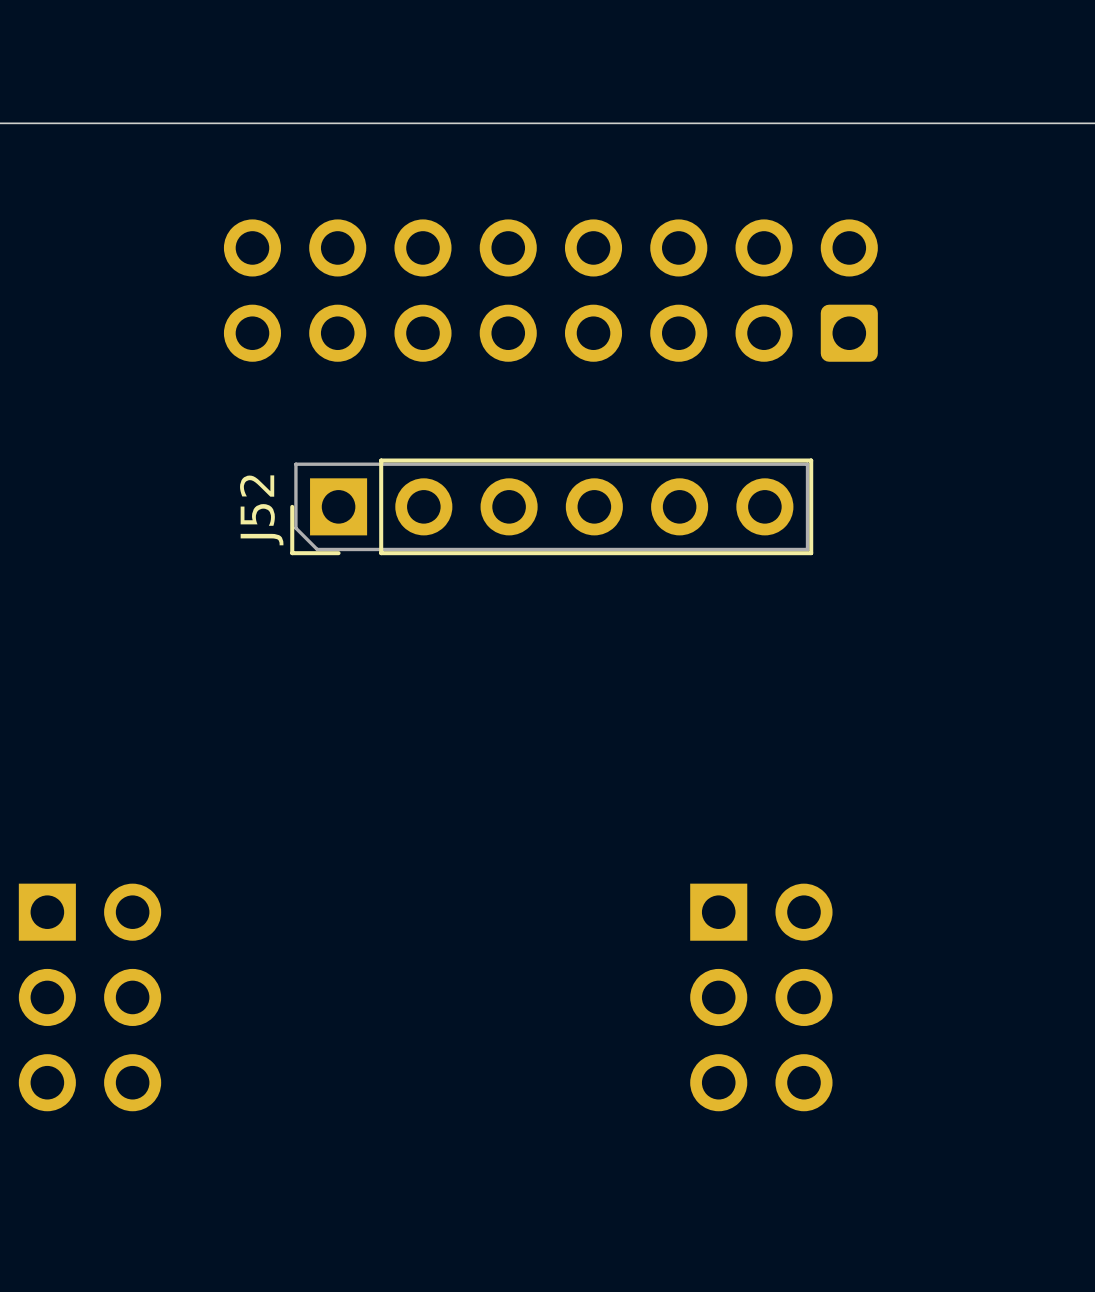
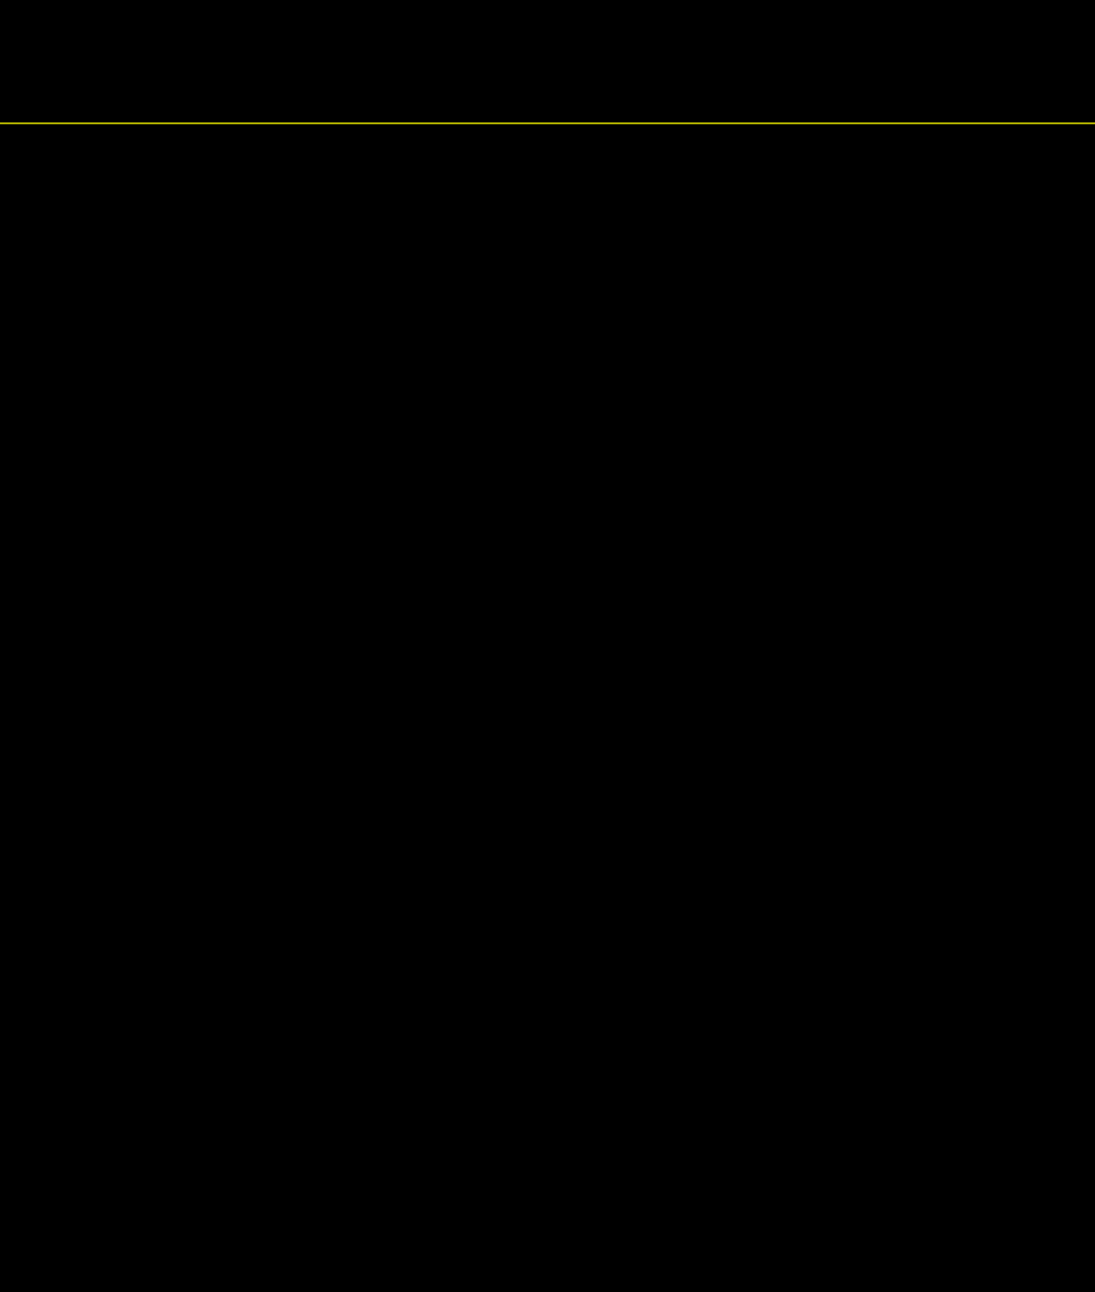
part: (550, 290) -> none
J52: (551, 506) -> none
part: (89, 997) -> none
part: (761, 997) -> none

